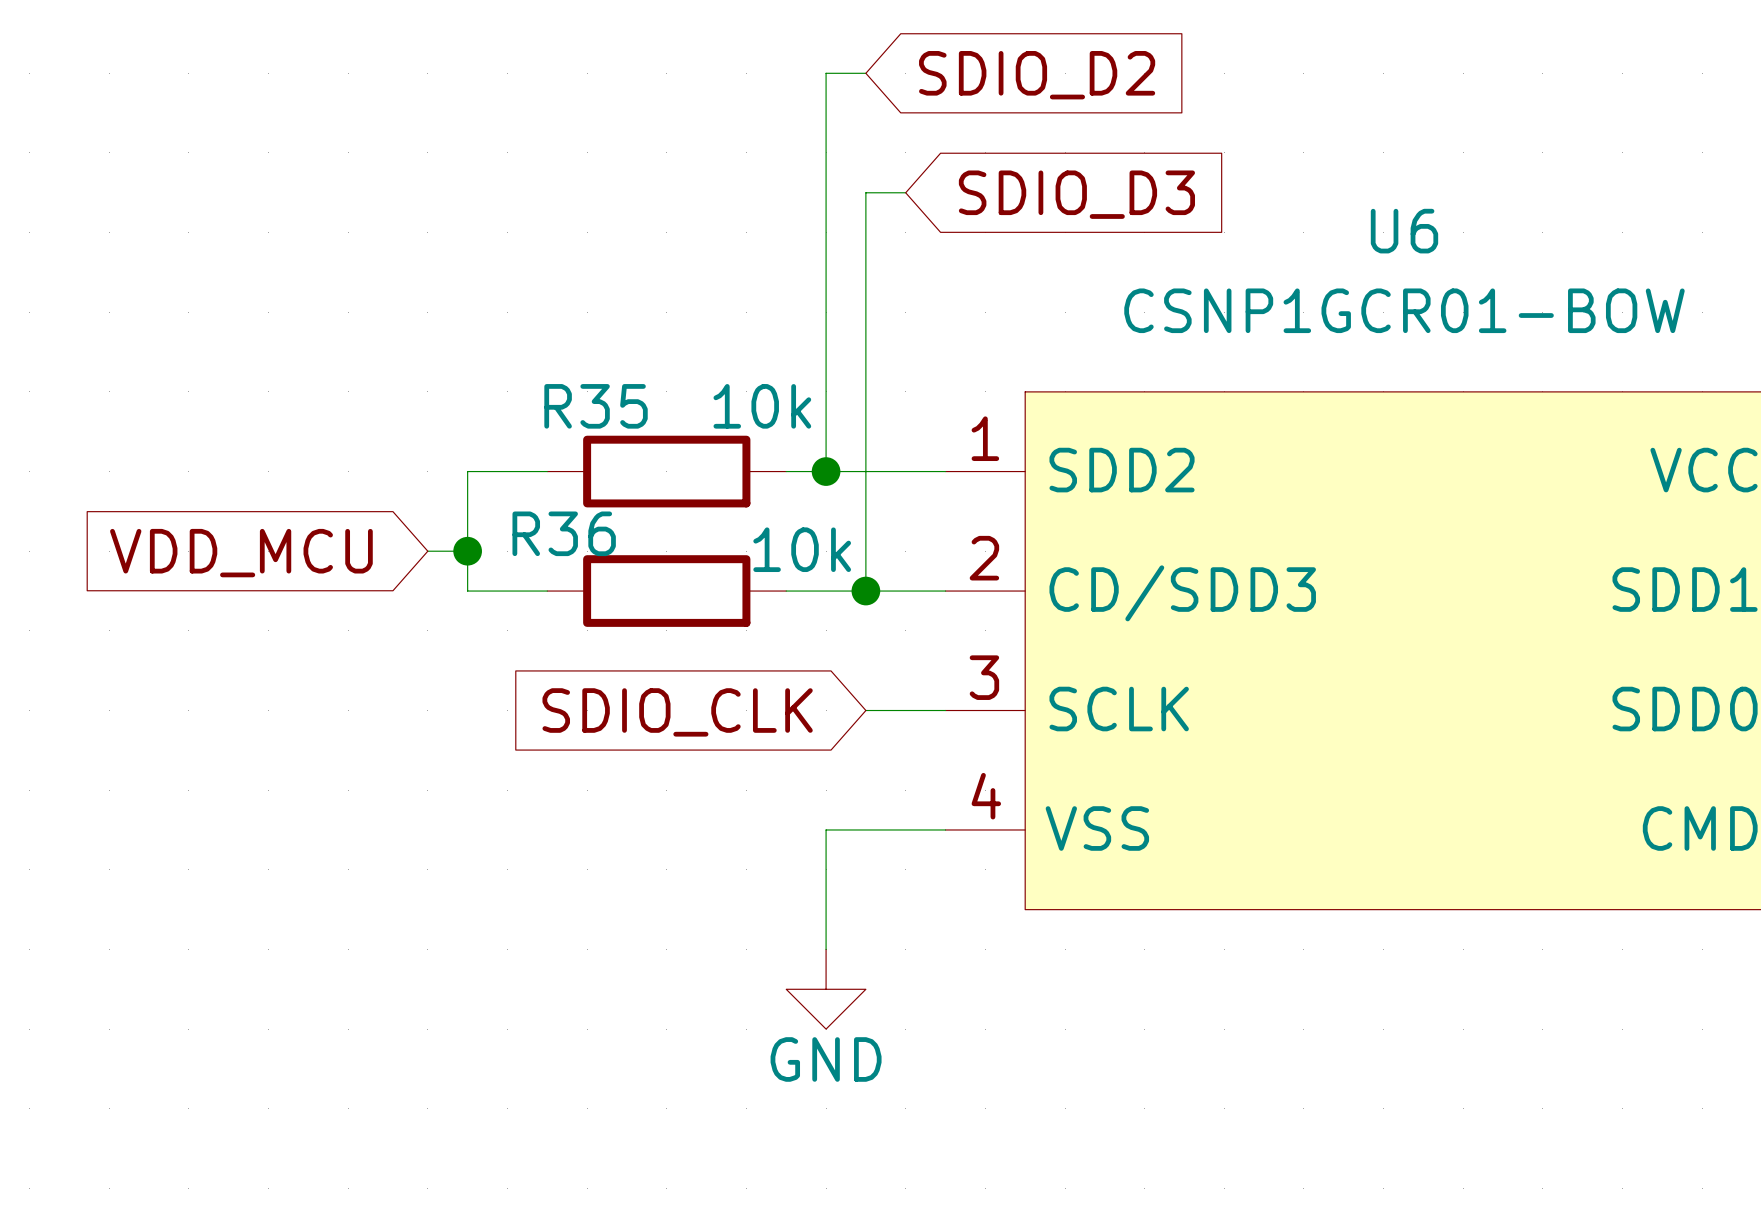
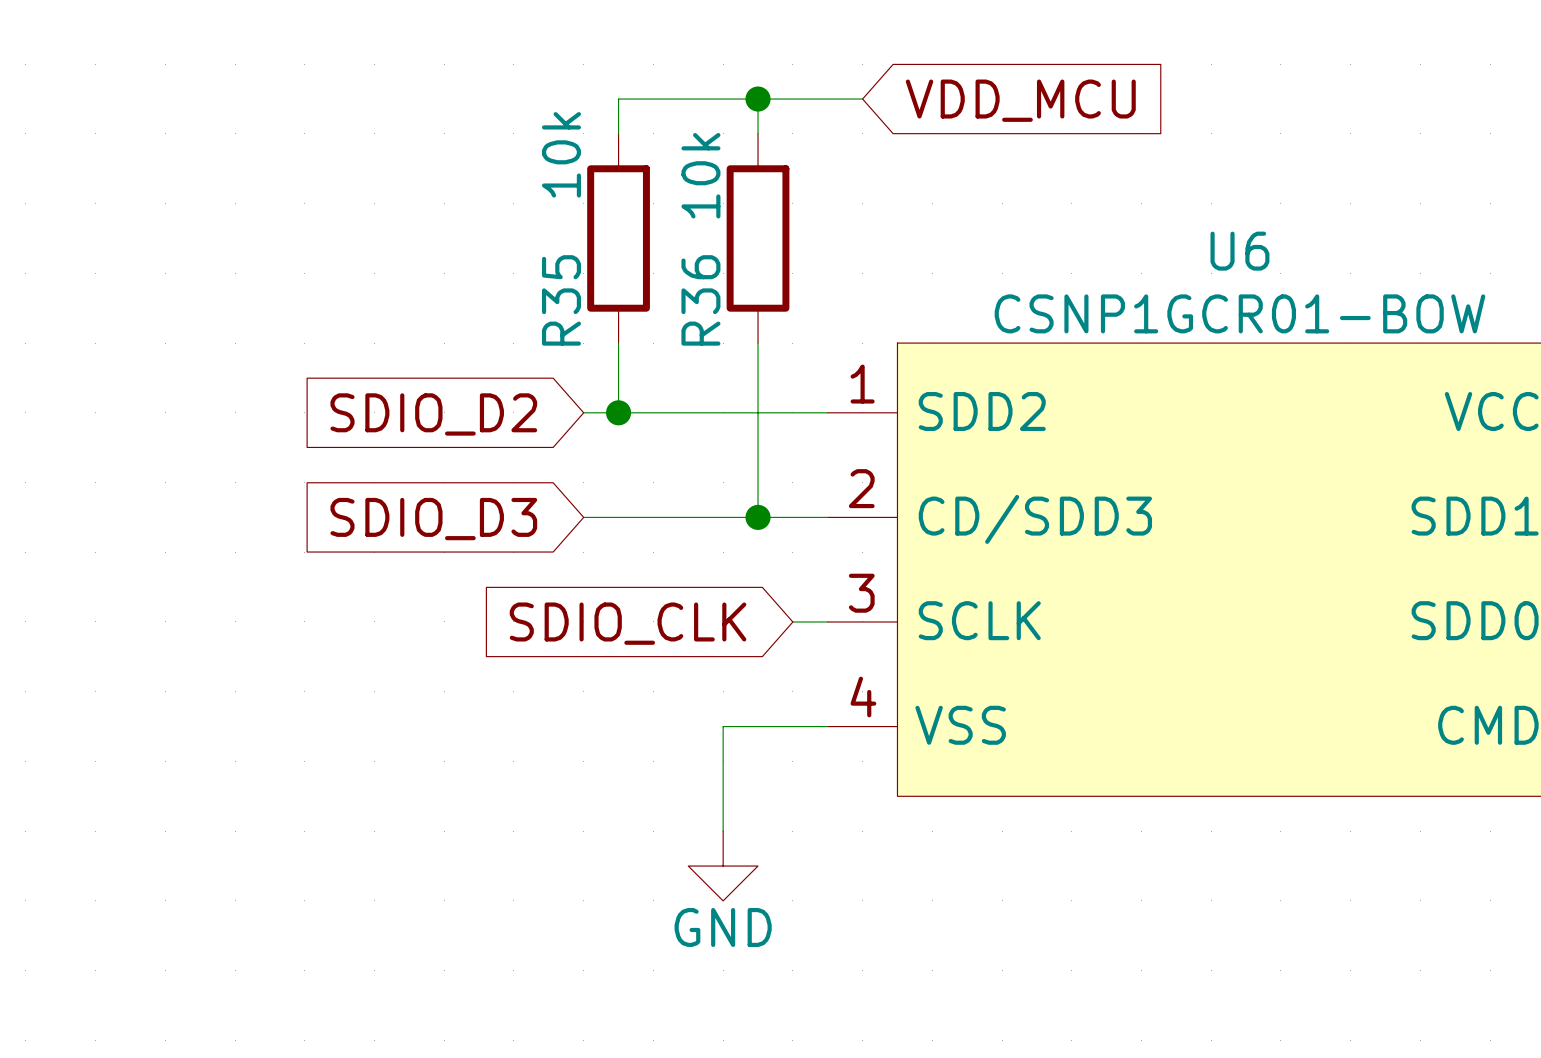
wire: (865, 73) (826, 73) (826, 471) -> none
global label rotation: 0° (1037, 75) -> 180° (433, 414)
global label position: SDIO_D2 (1037, 75) -> SDIO_D2 (433, 414)
wire: none -> (758, 99) (758, 133)
junction: none -> (758, 99)
wire: none -> (862, 99) (618, 99) (618, 133)
wire: (905, 192) (865, 192) (865, 391) -> none
global label rotation: 0° (1076, 194) -> 180° (433, 519)
global label position: SDIO_D3 (1076, 194) -> SDIO_D3 (433, 519)
U6 name position: U6 (1404, 231) -> U6 (1239, 251)
U6 value position: CSNP1GCR01-BOW (1404, 310) -> CSNP1GCR01-BOW (1239, 313)
wire: none -> (618, 343) (618, 412)
R35 name position: R35 (596, 406) -> R35 (561, 300)
R35 value position: 10k (762, 406) -> 10k (561, 154)
wire: (547, 471) (467, 471) (467, 591) (547, 591) -> none
wire: none -> (583, 412) (688, 412)
R35 rotation: 0° (666, 471) -> 90° clockwise (618, 238)
R35 position: (666, 471) -> (618, 238)
junction position: (826, 471) -> (618, 412)
R36 name position: R36 (564, 533) -> R36 (700, 300)
R36 value position: 10k (802, 549) -> 10k (700, 175)
junction: (467, 551) -> none
global label rotation: 0° (241, 553) -> 180° (1020, 100)
global label position: VDD_MCU (241, 553) -> VDD_MCU (1020, 100)
wire: none -> (583, 517) (688, 517)
R36 rotation: 0° (666, 591) -> 90° clockwise (758, 238)
R36 position: (666, 591) -> (758, 238)
wire: (865, 710) (905, 710) -> none
global label position: SDIO_CLK (677, 712) -> SDIO_CLK (628, 623)

